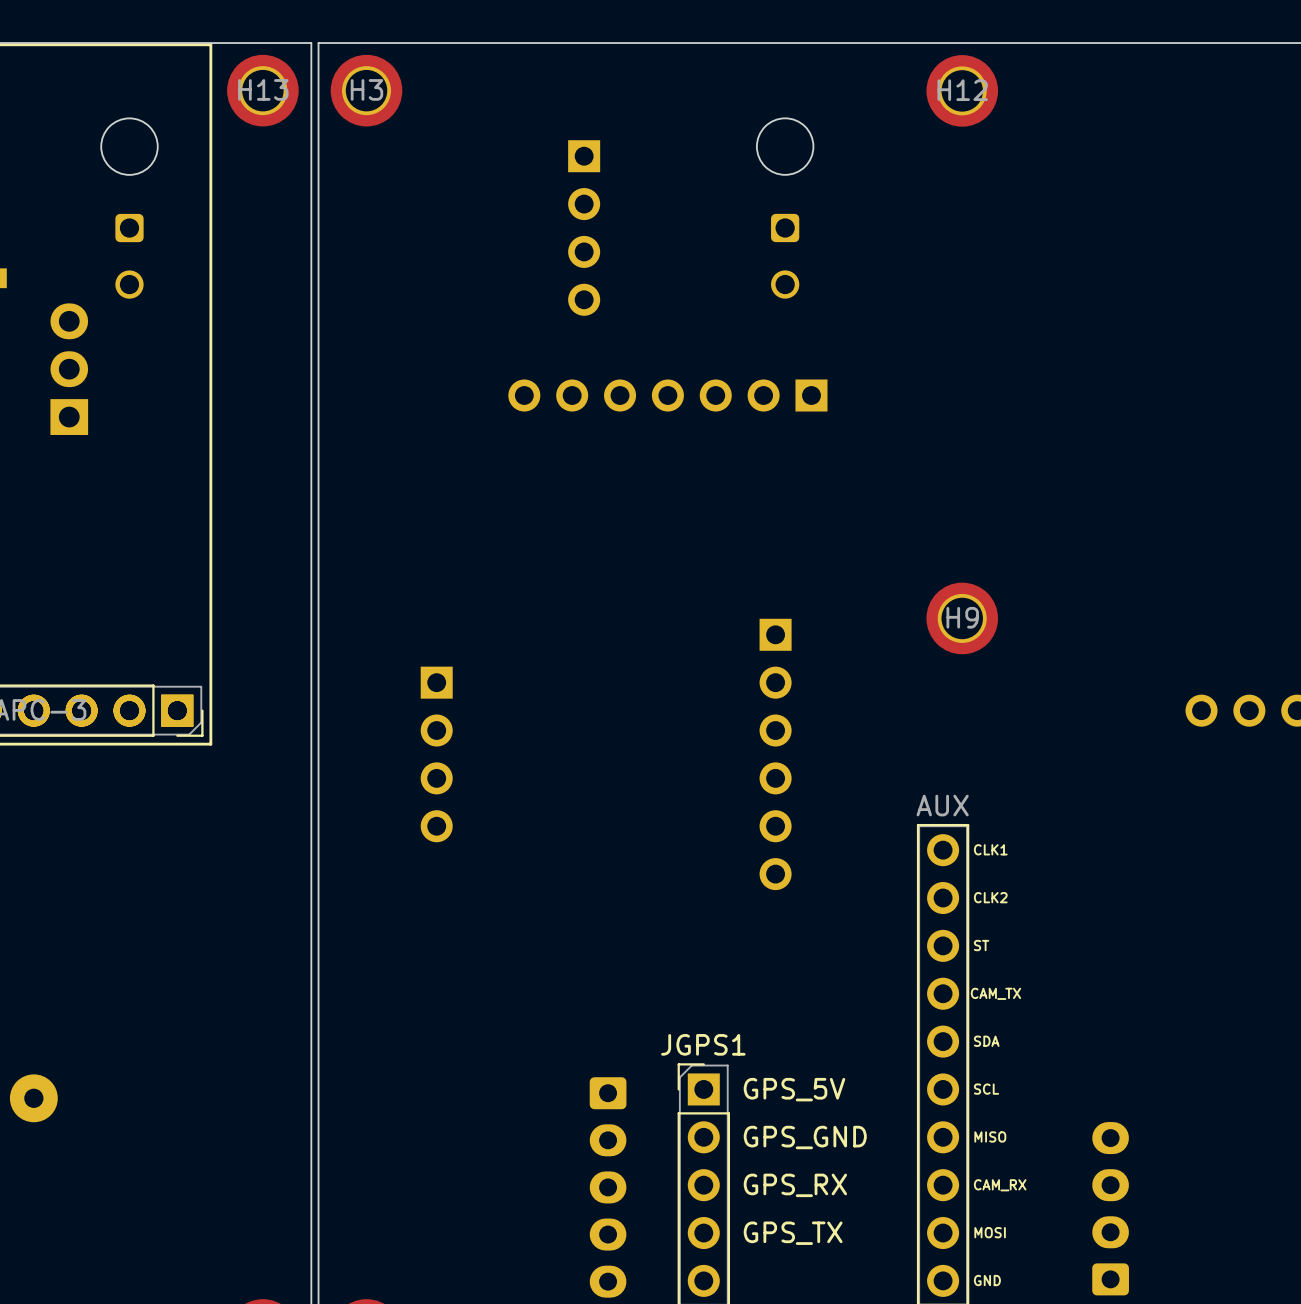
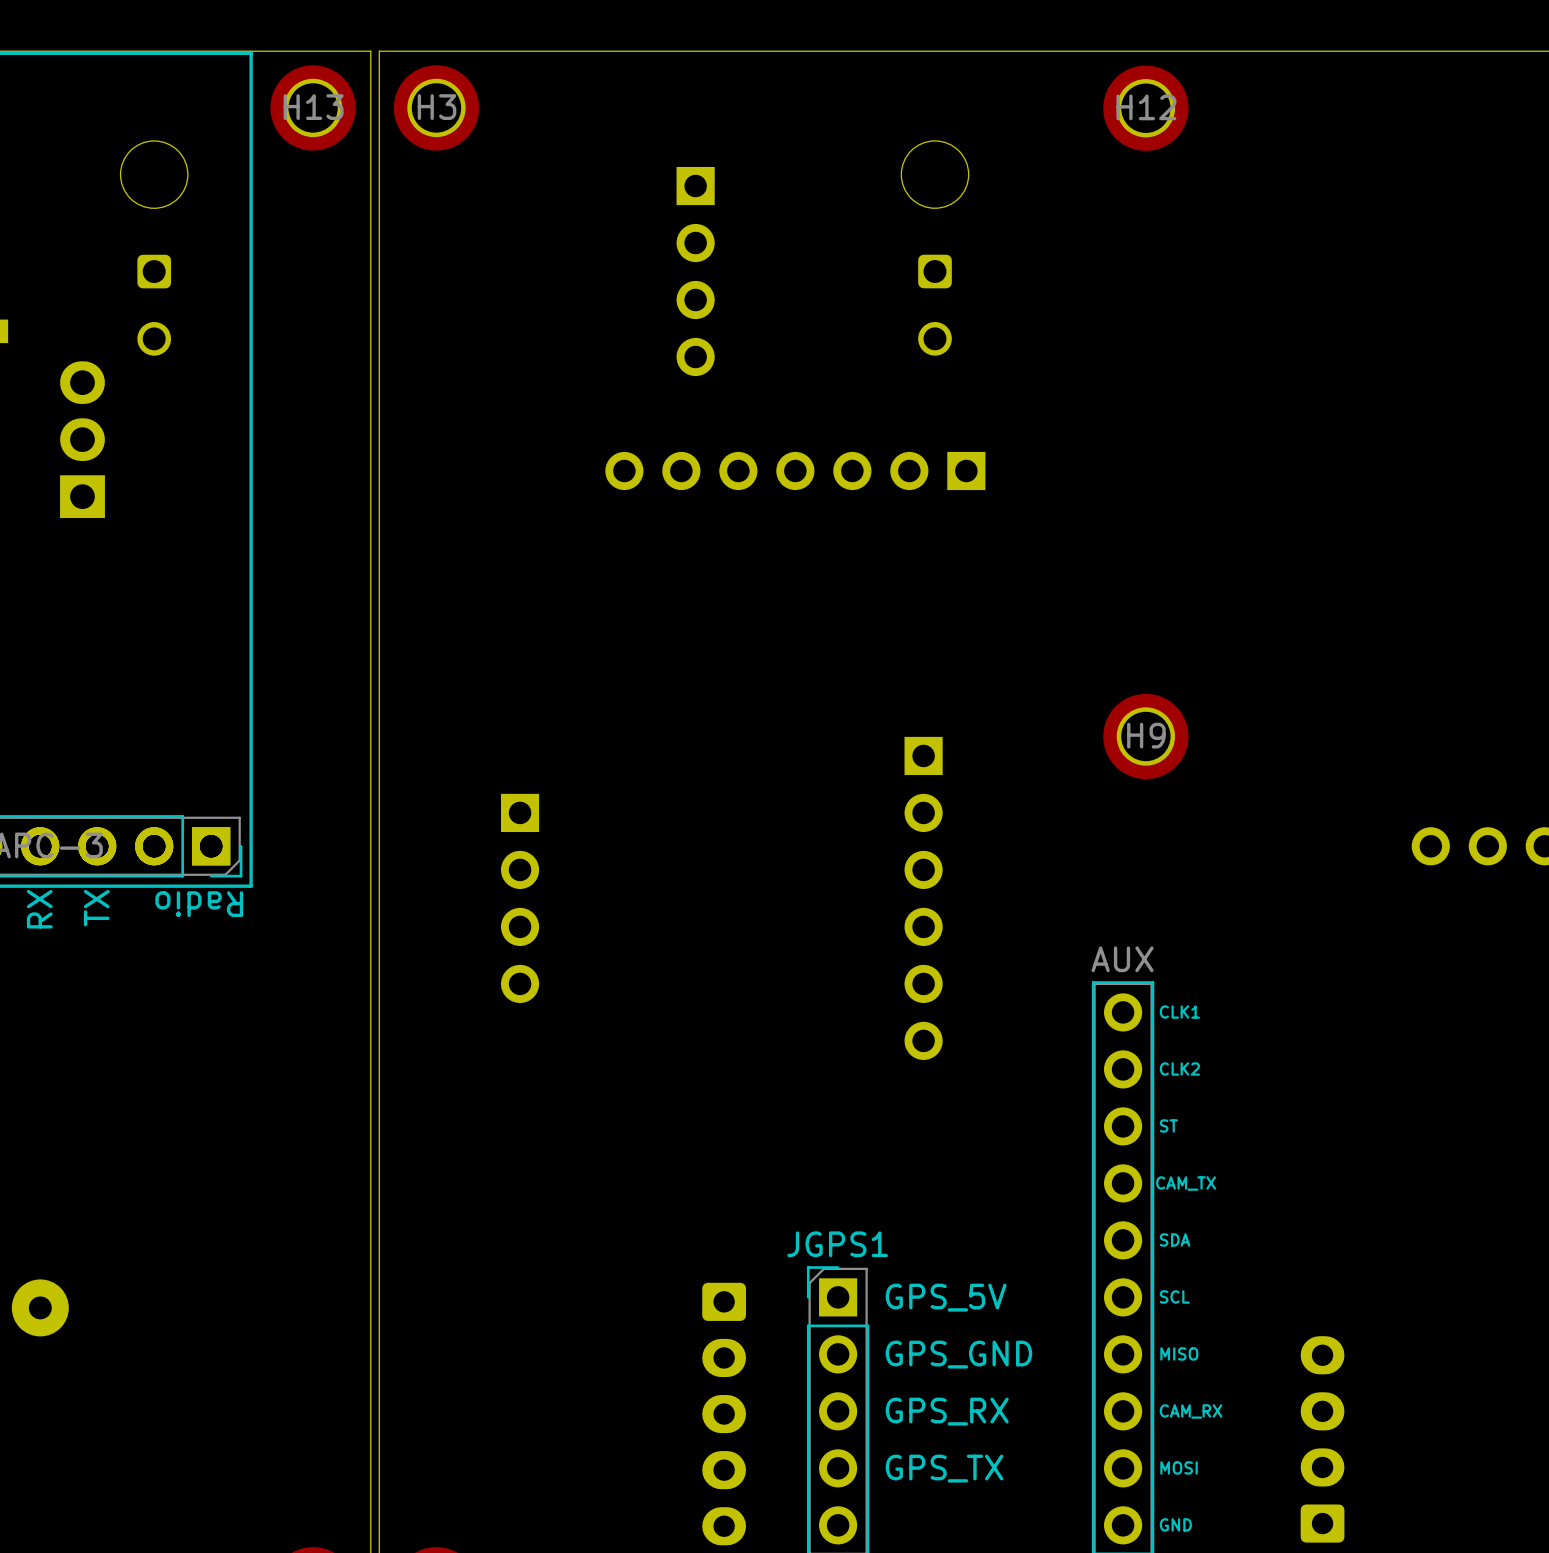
text: none -> Radio (199, 904)
text: none -> TX (96, 908)
text: none -> RX (39, 909)

